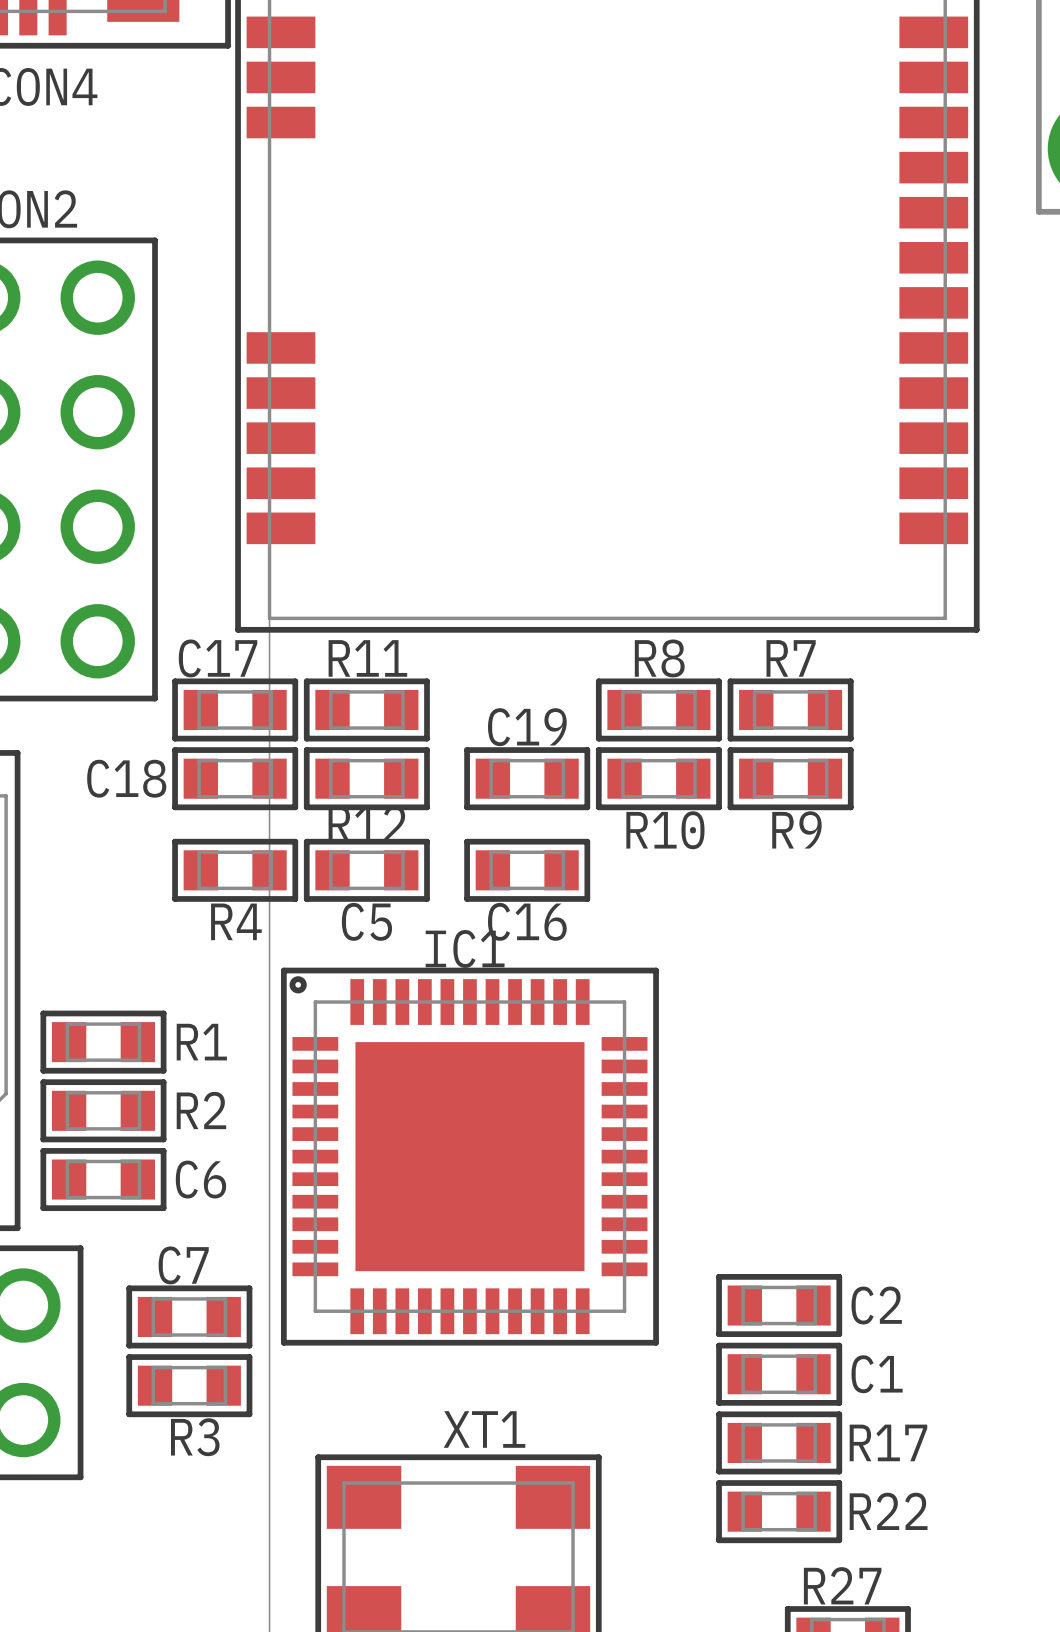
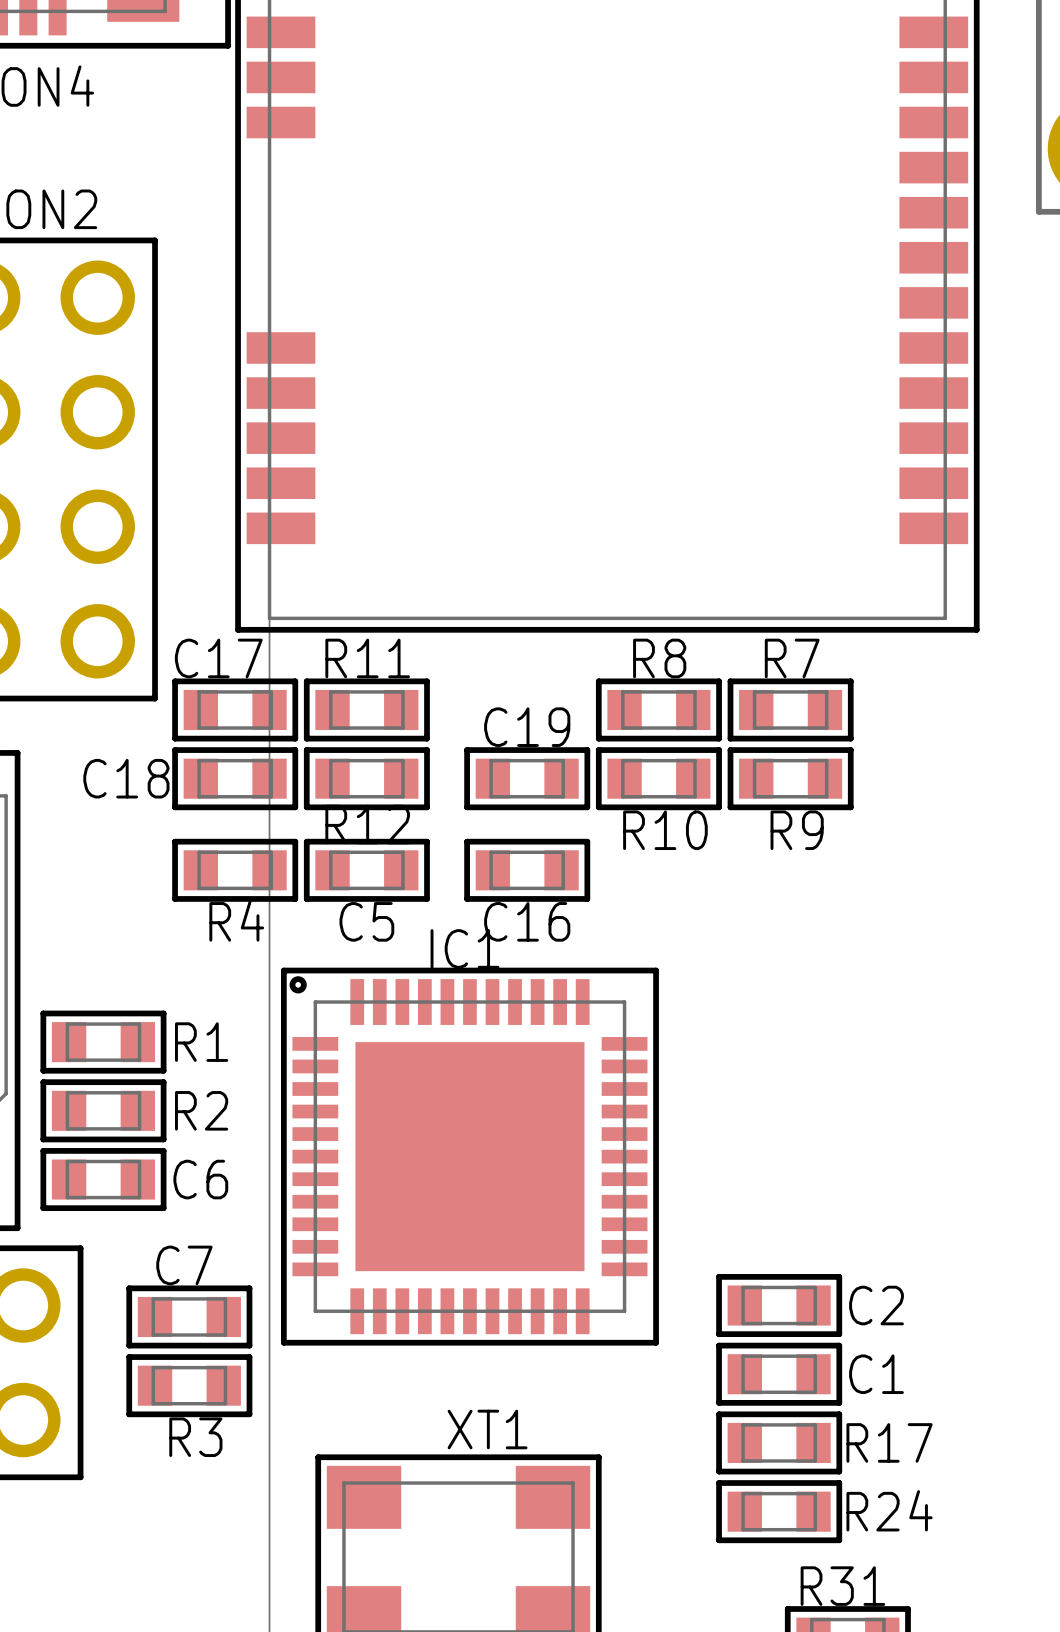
R22 name: R22 (888, 1511) -> R24 (889, 1510)
R27 name: R27 (842, 1585) -> R31 (842, 1586)

